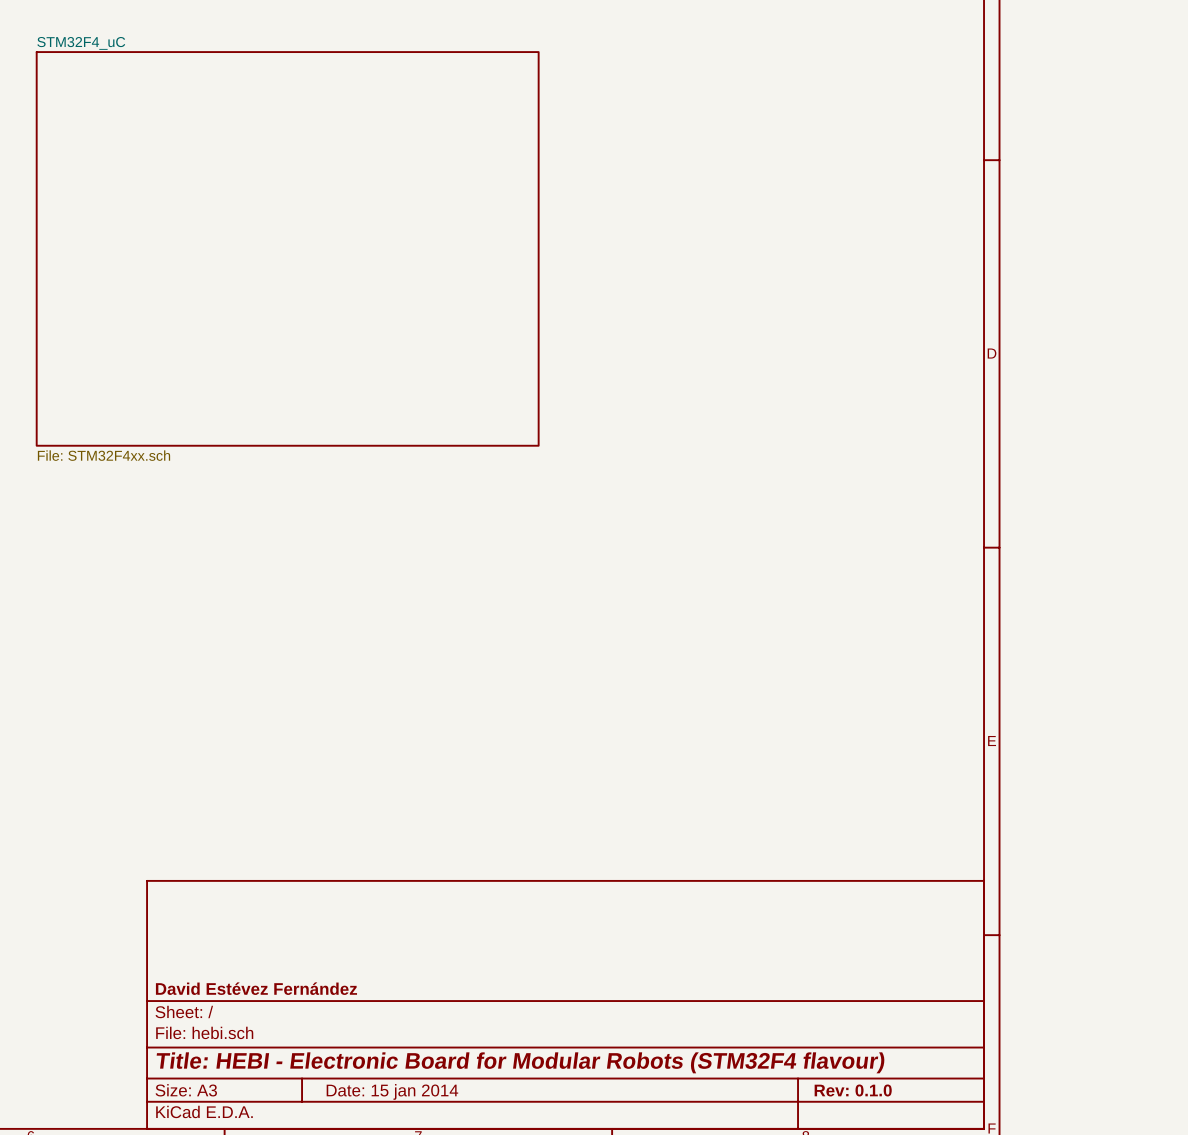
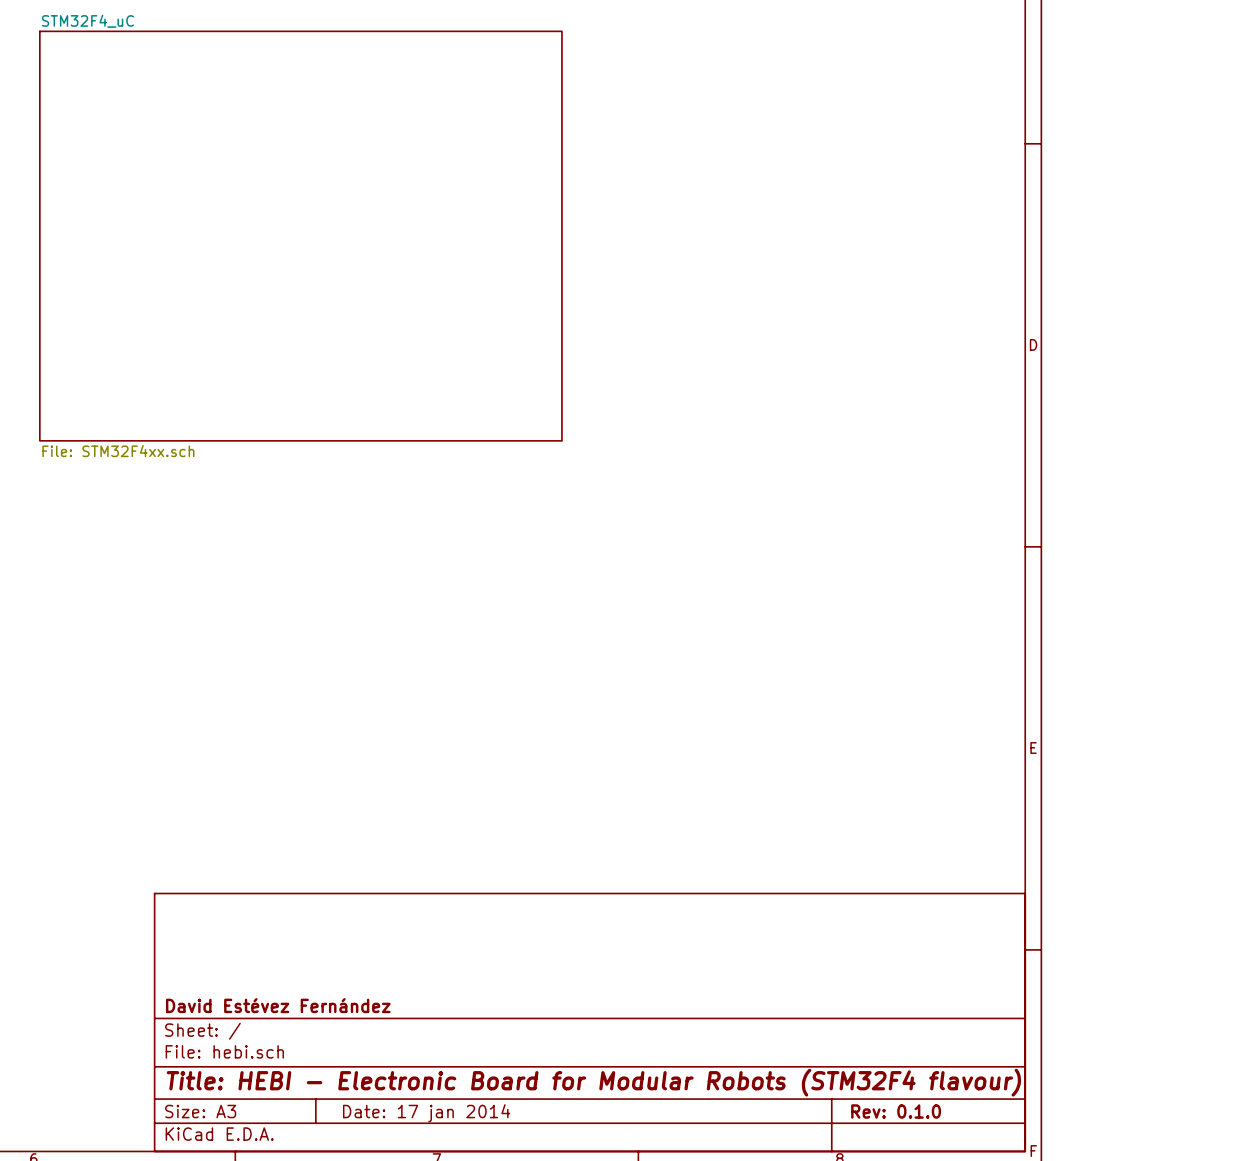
title block: Date: 15 jan 2014 (392, 1091) -> Date: 17 jan 2014 (426, 1113)

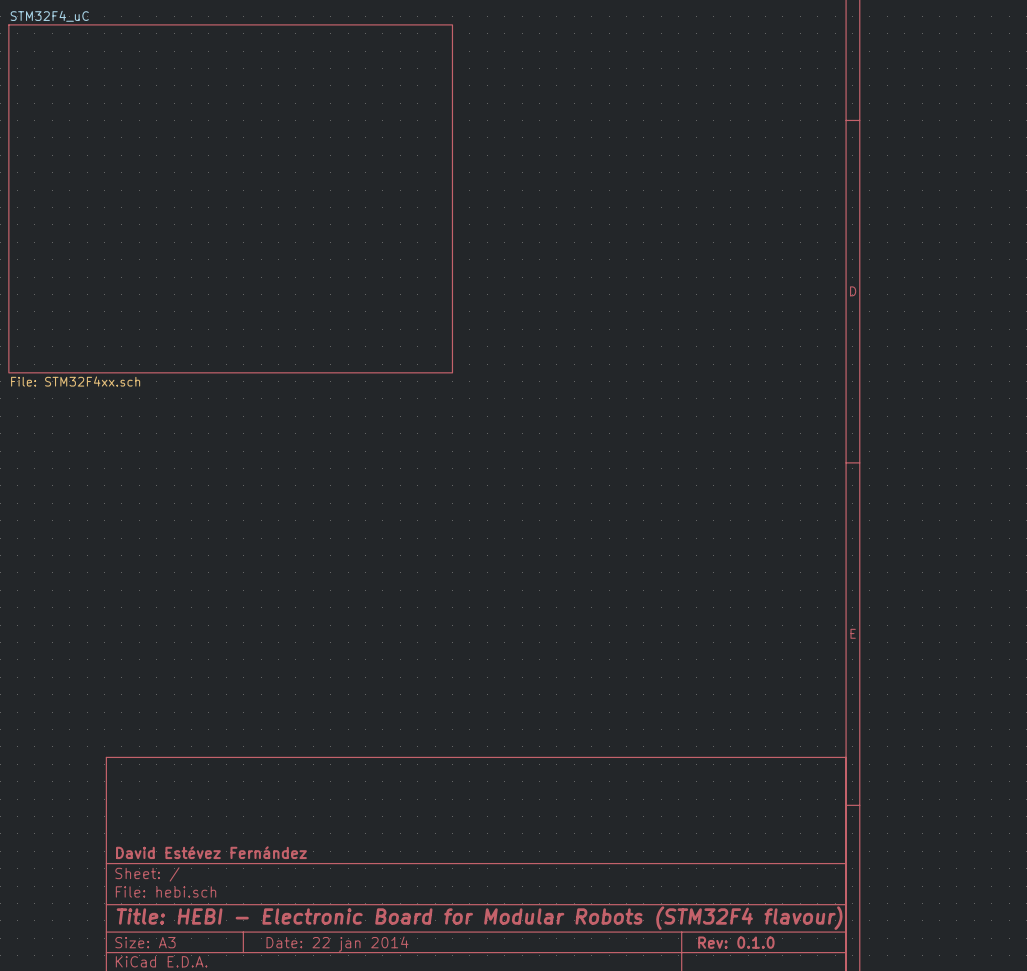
title block: Date: 17 jan 2014 (426, 1113) -> Date: 22 jan 2014 (337, 944)

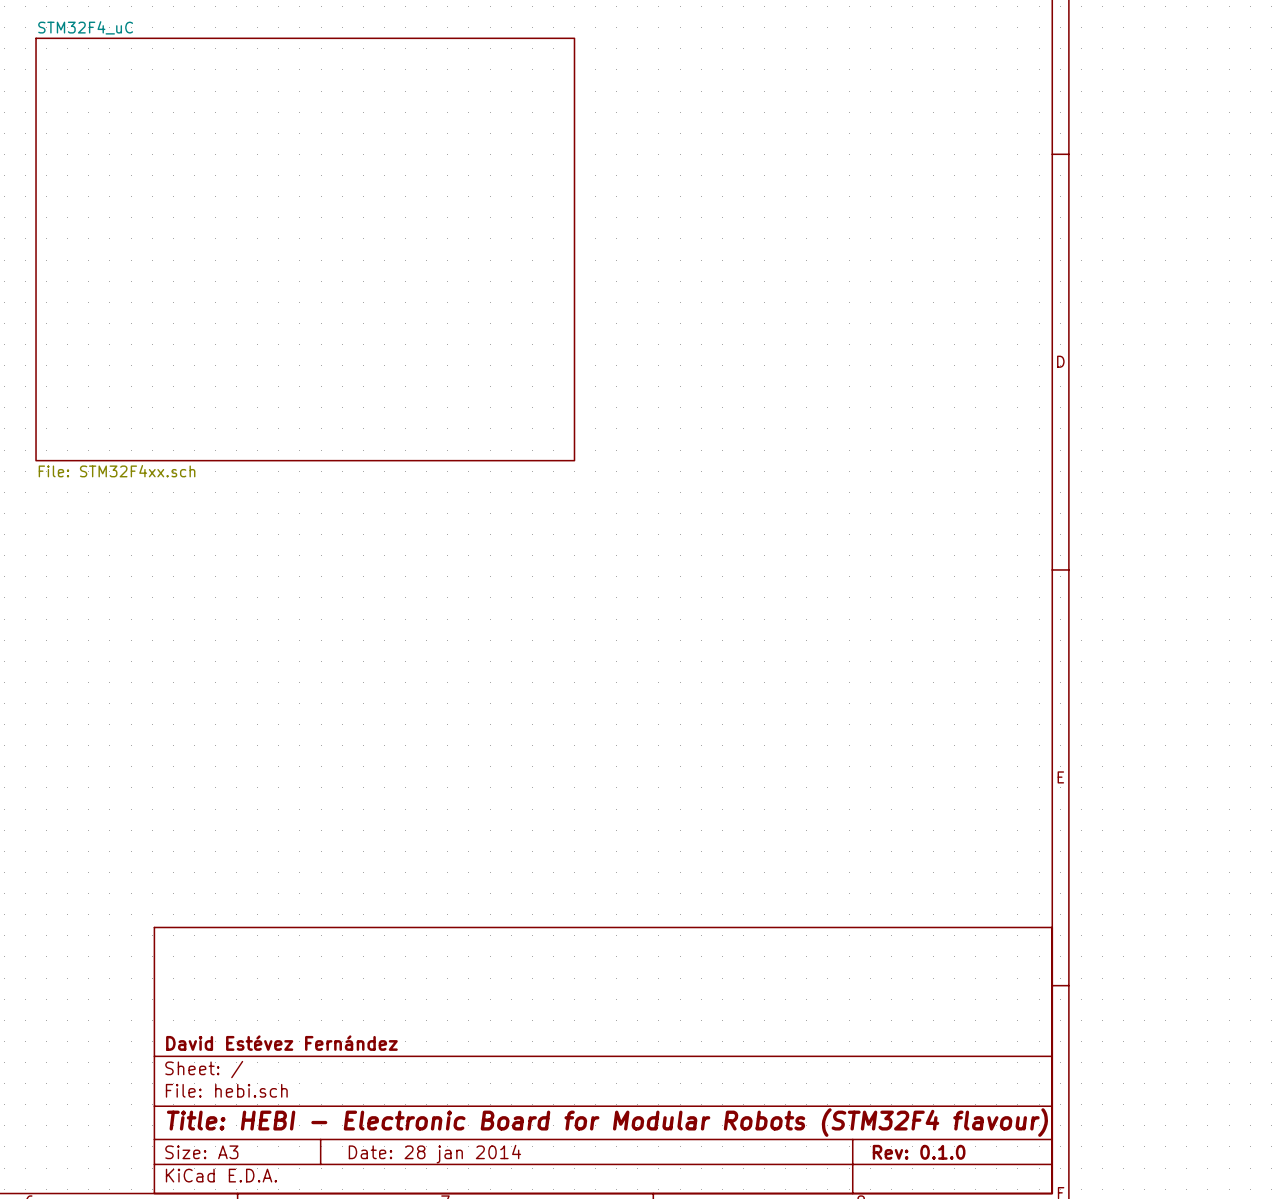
title block: Date: 22 jan 2014 (337, 944) -> Date: 28 jan 2014 (434, 1154)

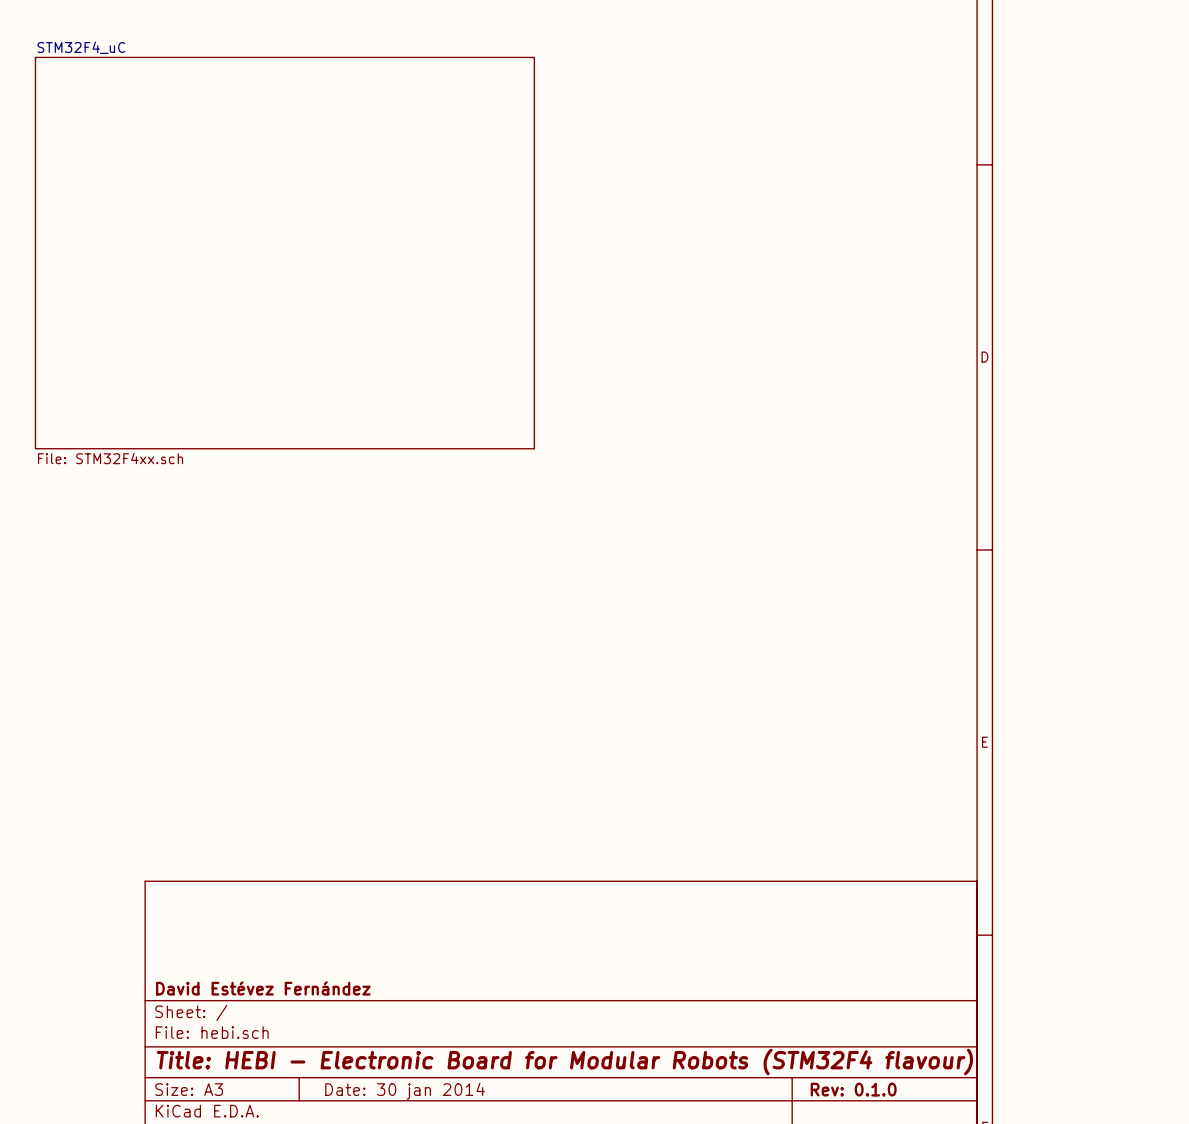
title block: Date: 28 jan 2014 (434, 1154) -> Date: 30 jan 2014 (405, 1091)

